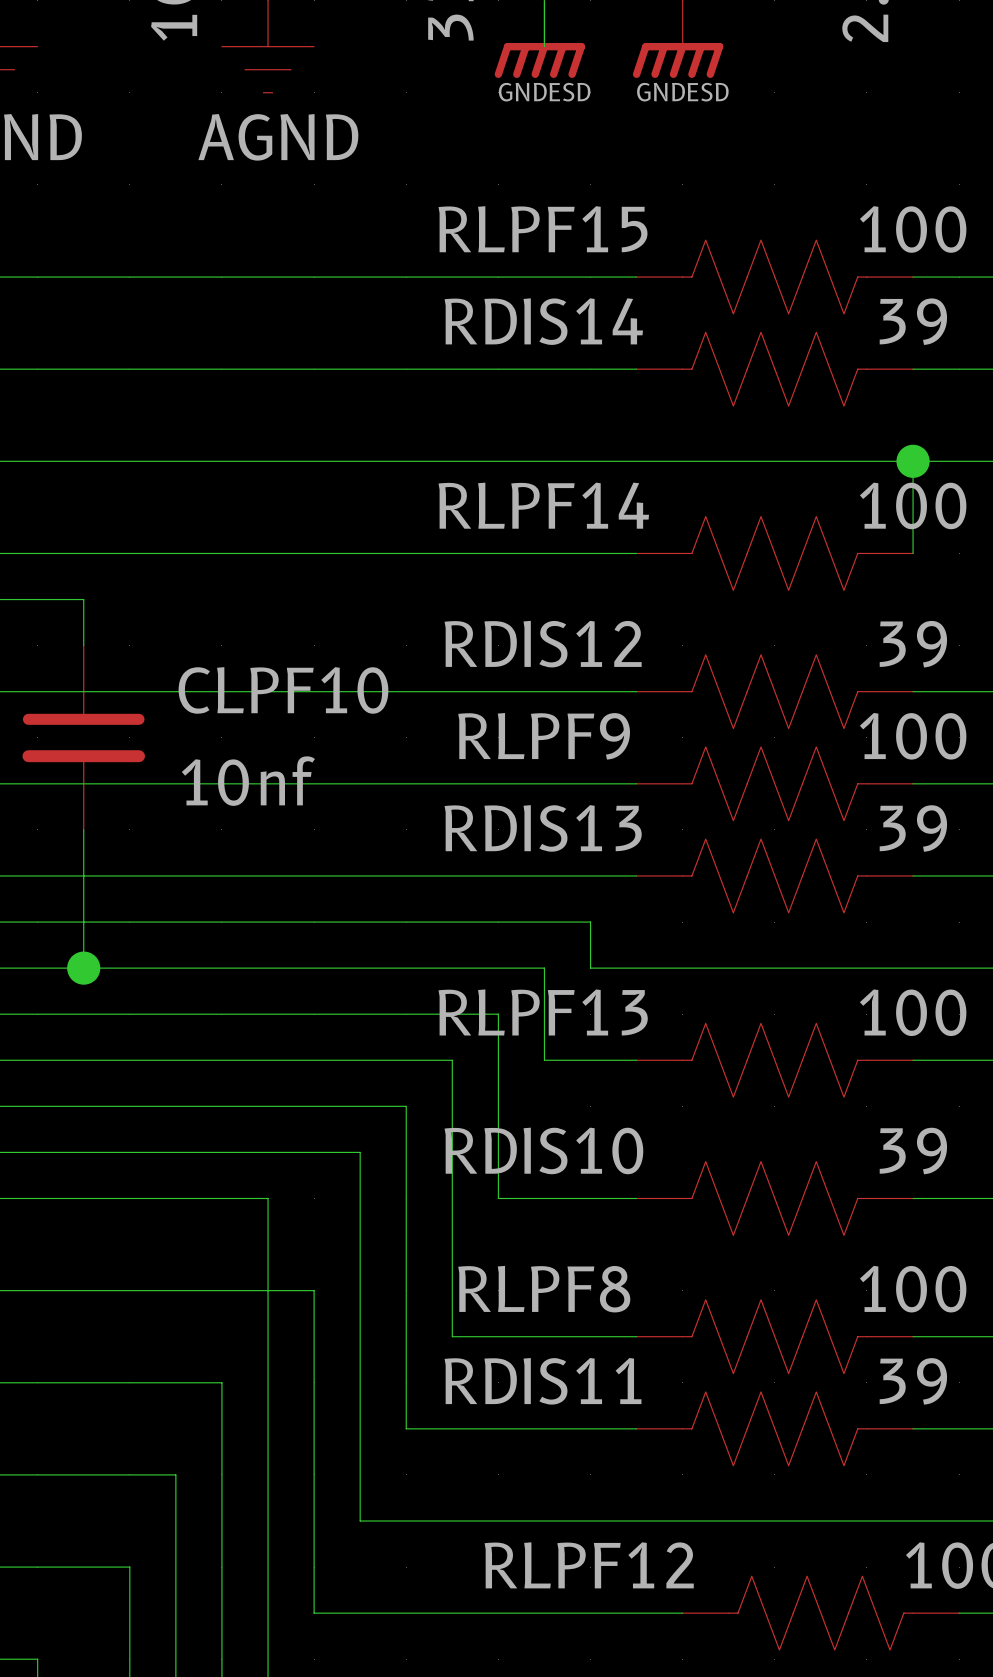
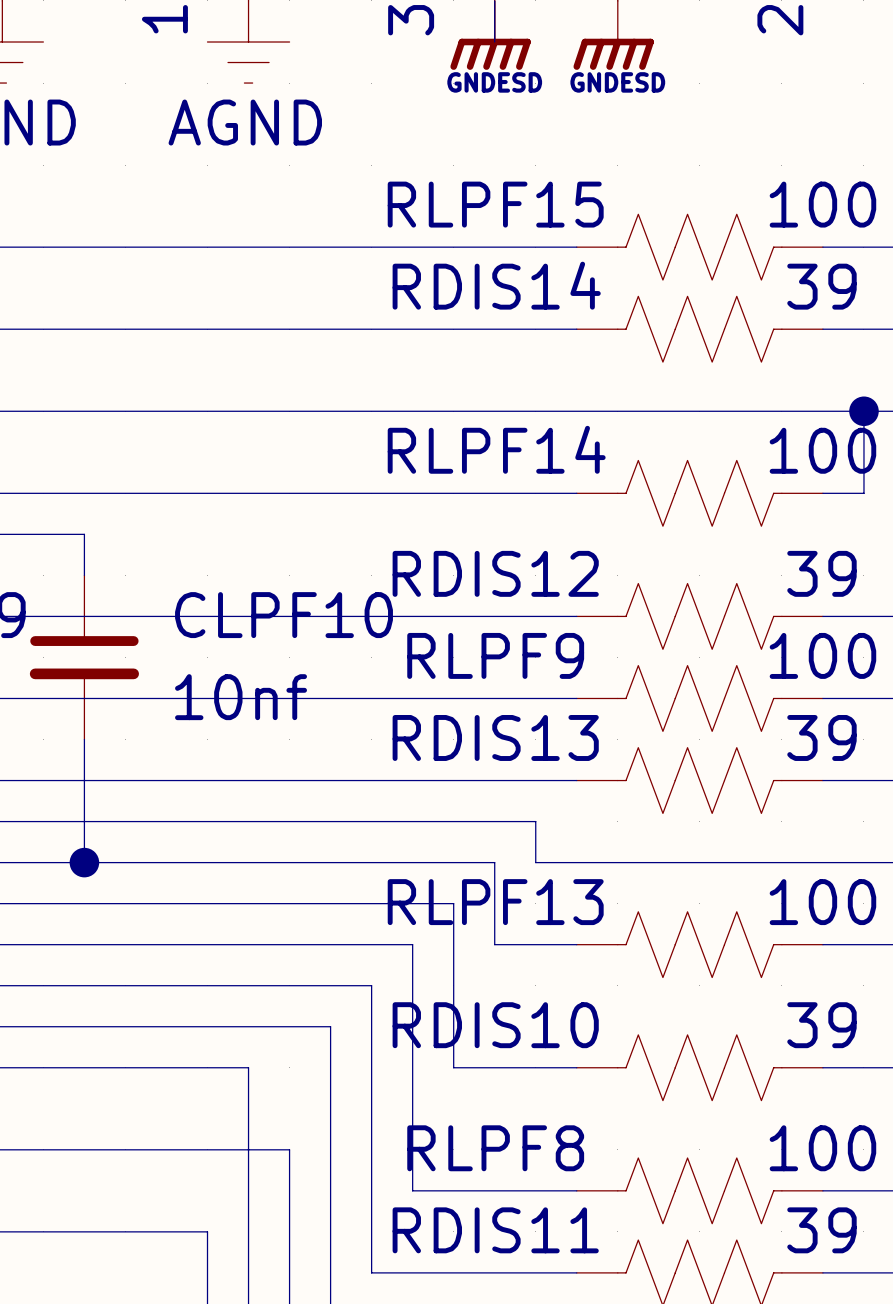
wire: (913, 461) (913, 553) -> (863, 411) (863, 493) (822, 493)
junction position: (913, 461) -> (863, 411)

